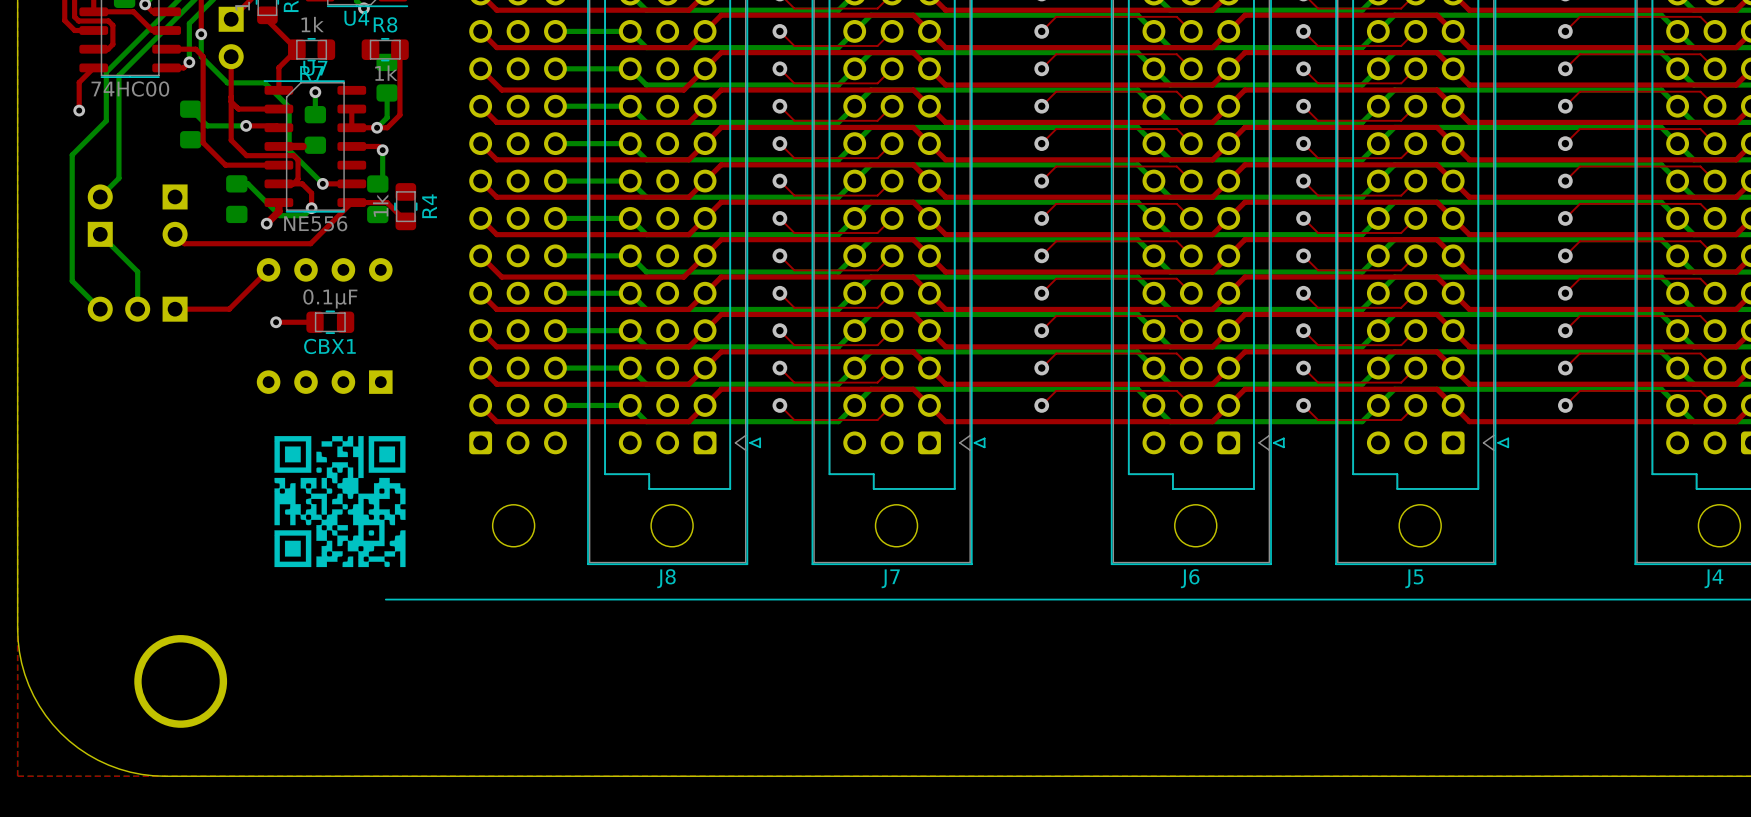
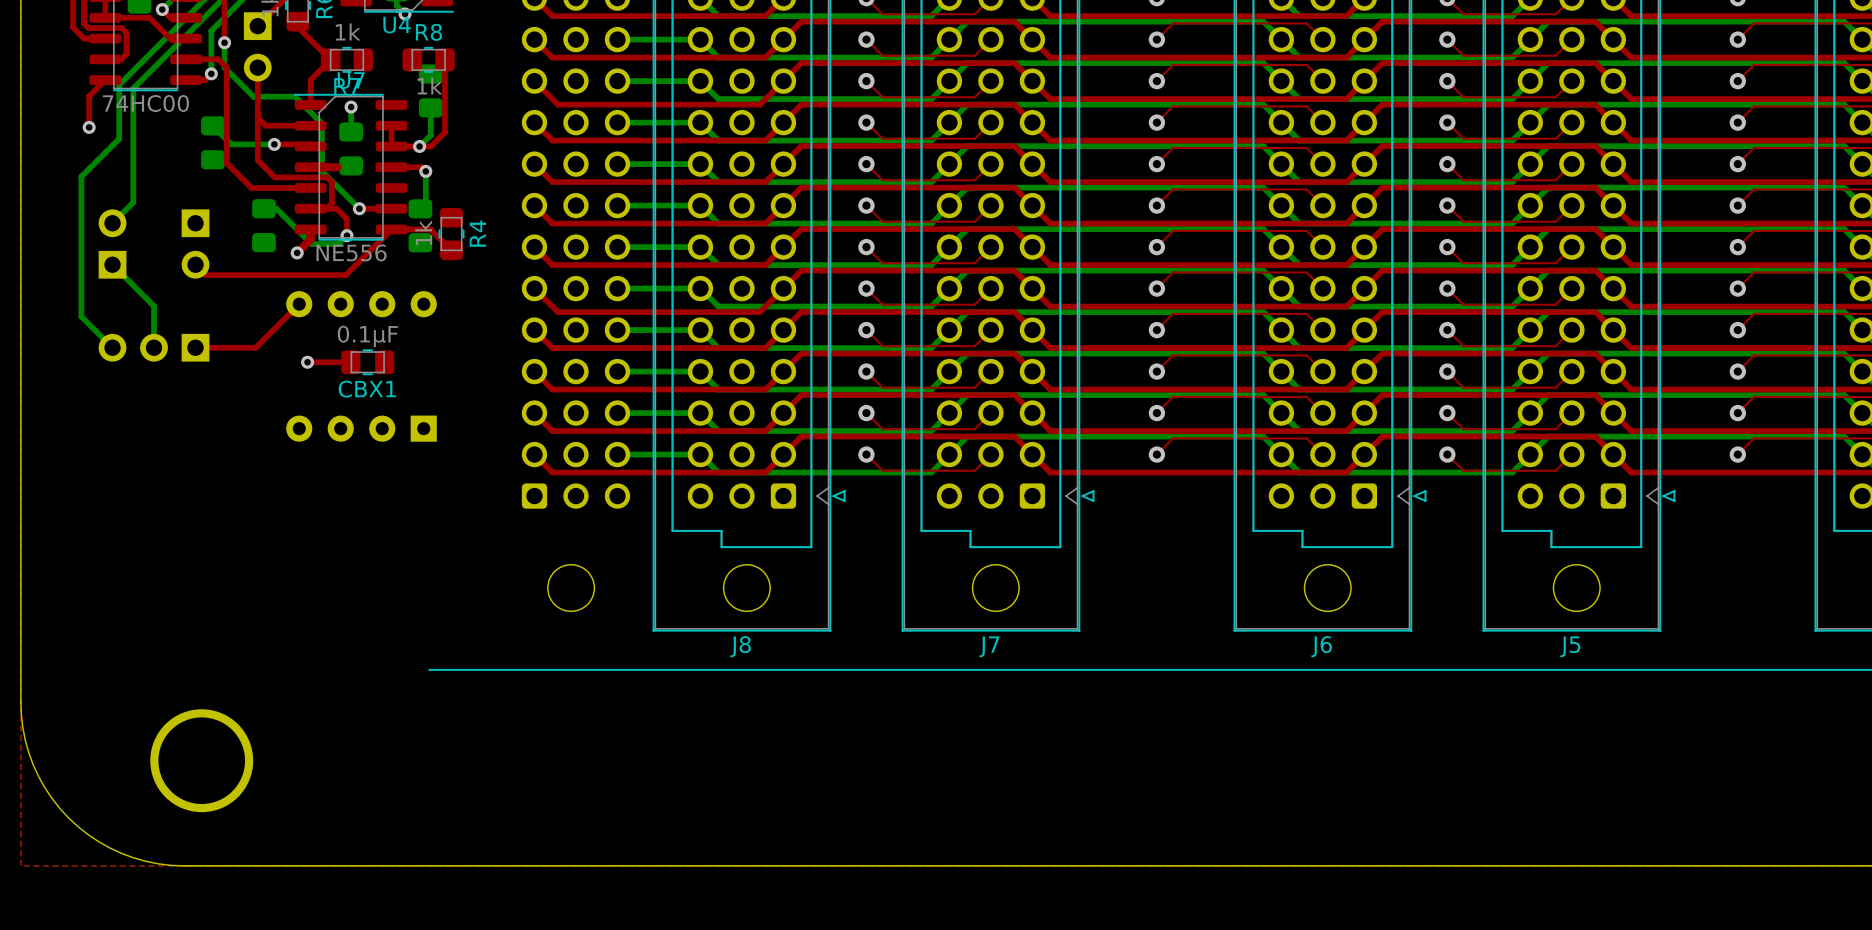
drawing: [274, 436, 406, 568] -> none

